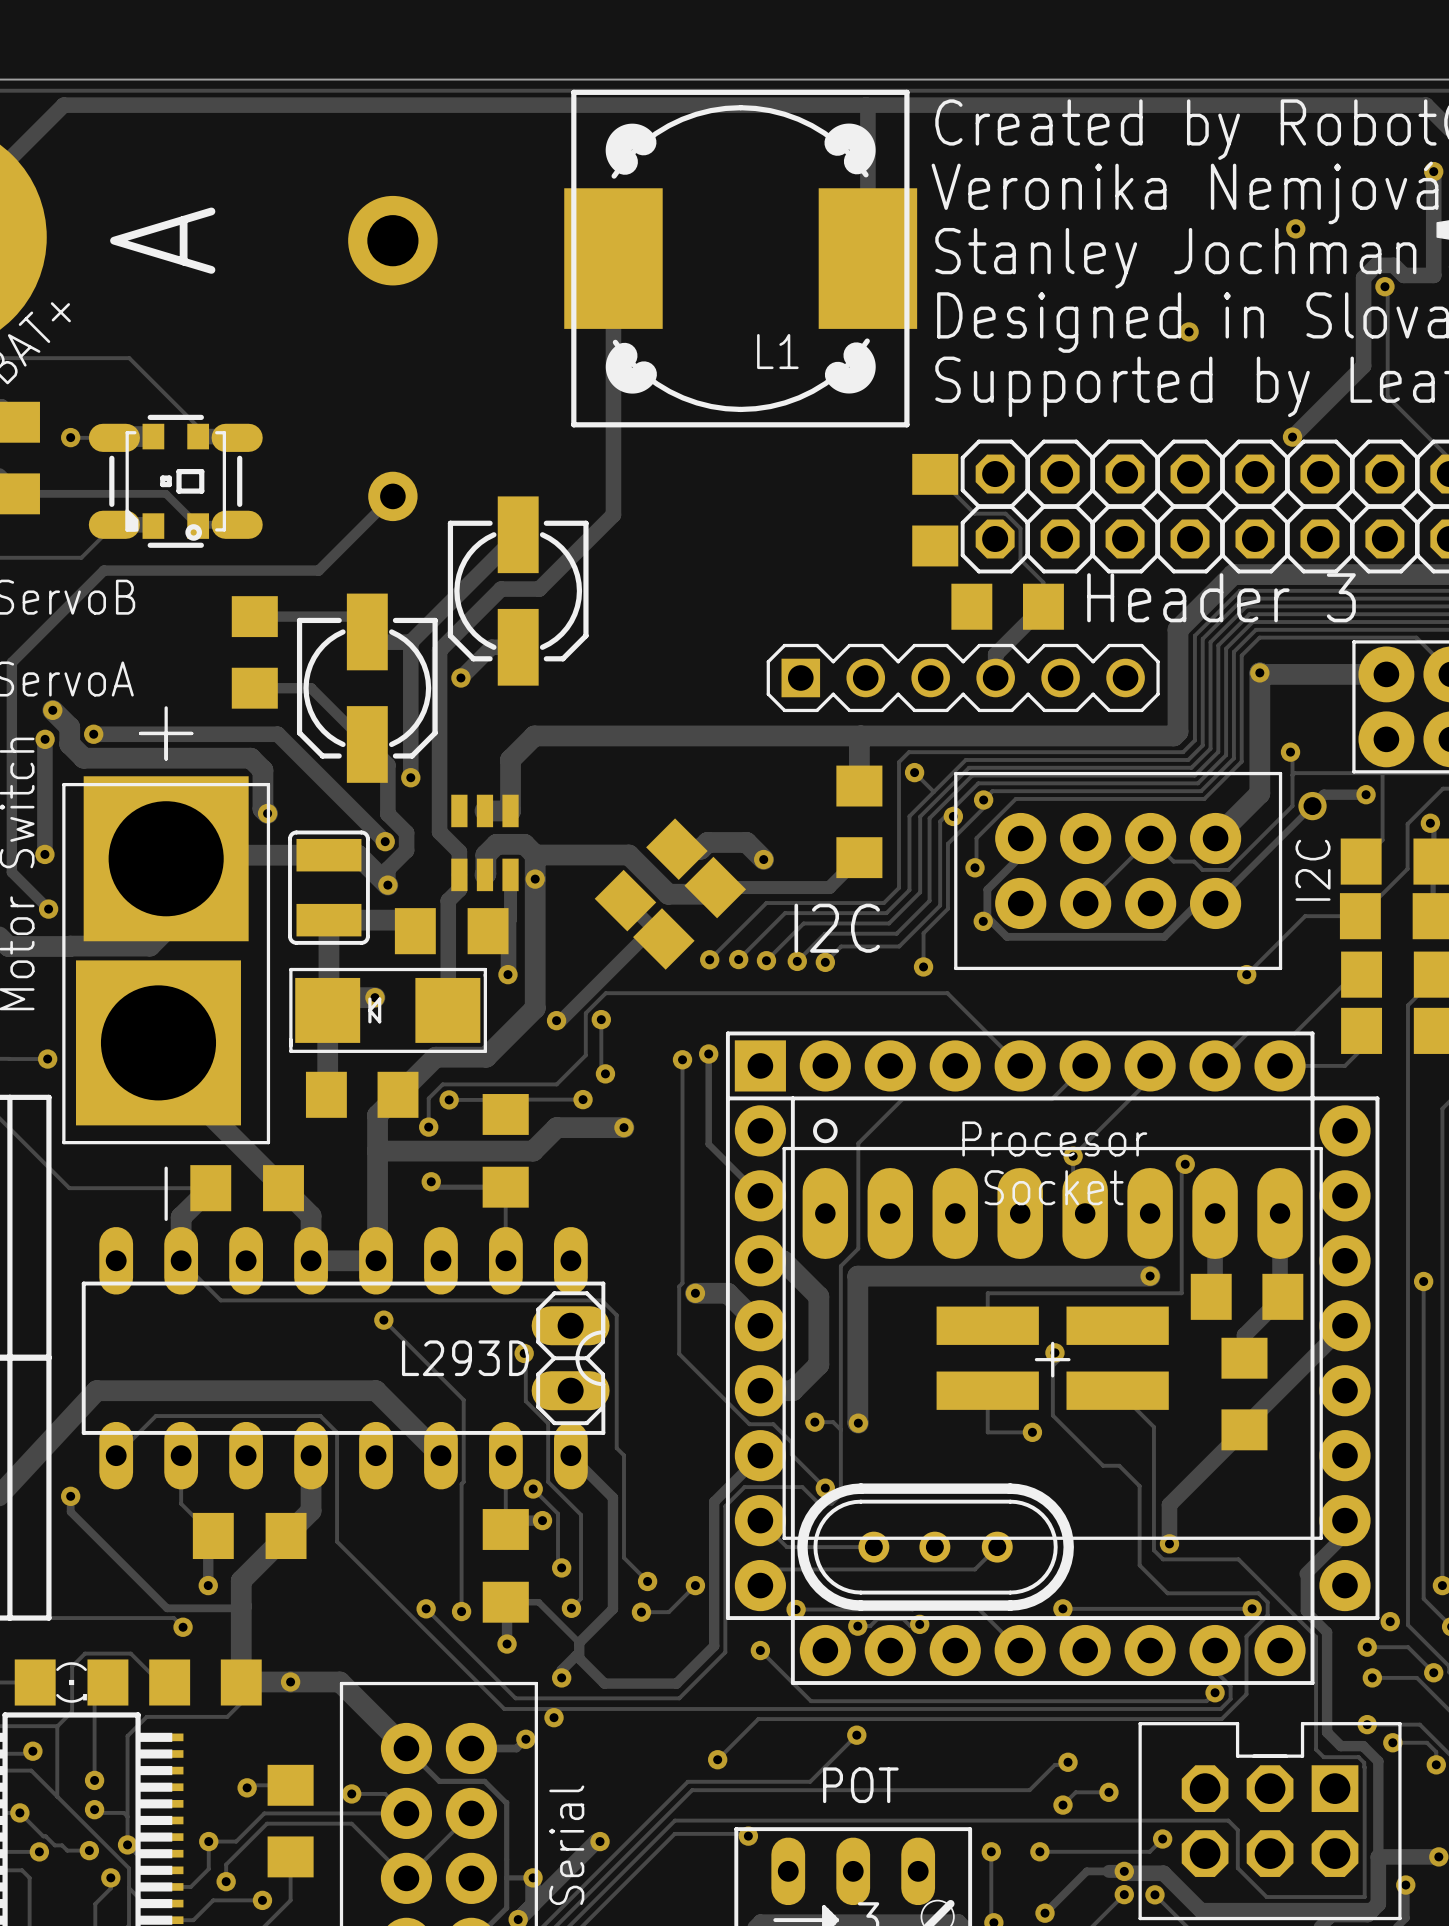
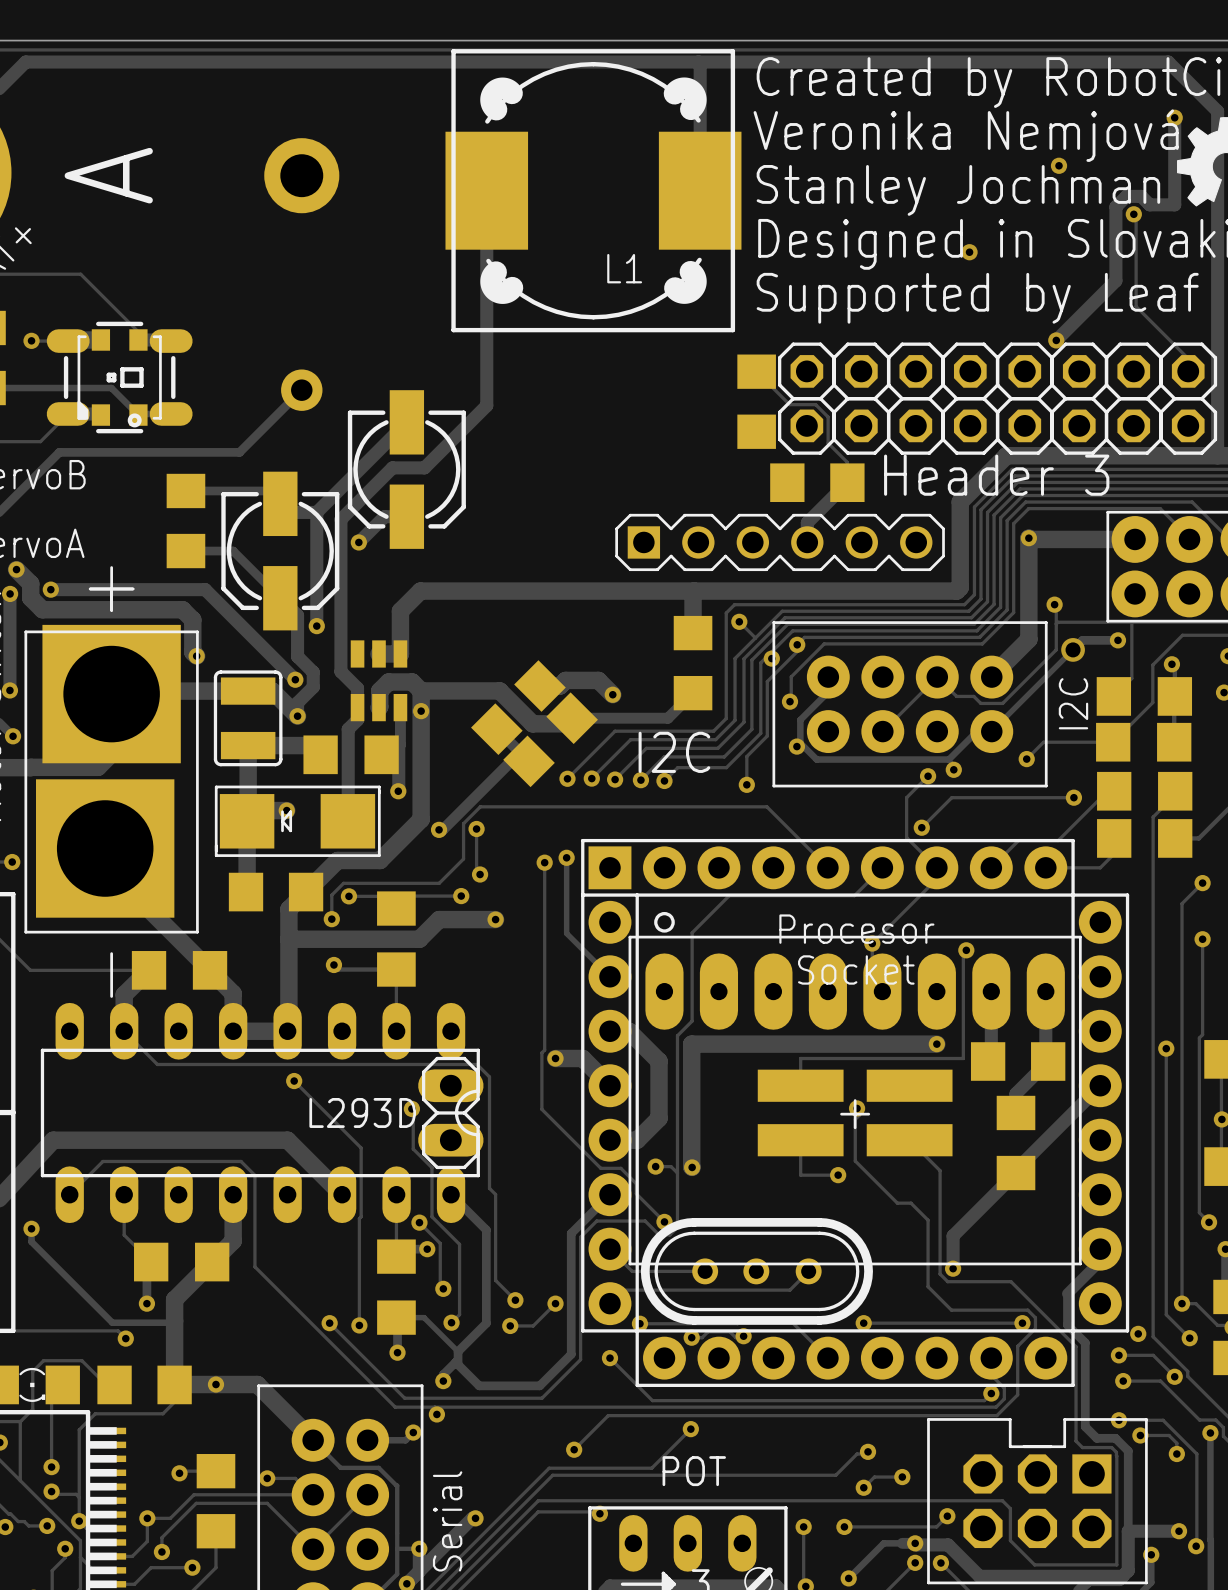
track: (1305, 916) (1246, 974) -> (1066, 742) (1043, 742) (1026, 759)
via: none -> (1026, 759)
via: none -> (953, 769)
track: none -> (928, 776) (906, 797) (906, 837) (936, 867)
via: none -> (928, 776)
via: (1246, 974) -> none
track: none -> (1073, 797) (951, 797) (921, 827)
via: none -> (1073, 797)
via: none -> (921, 827)

